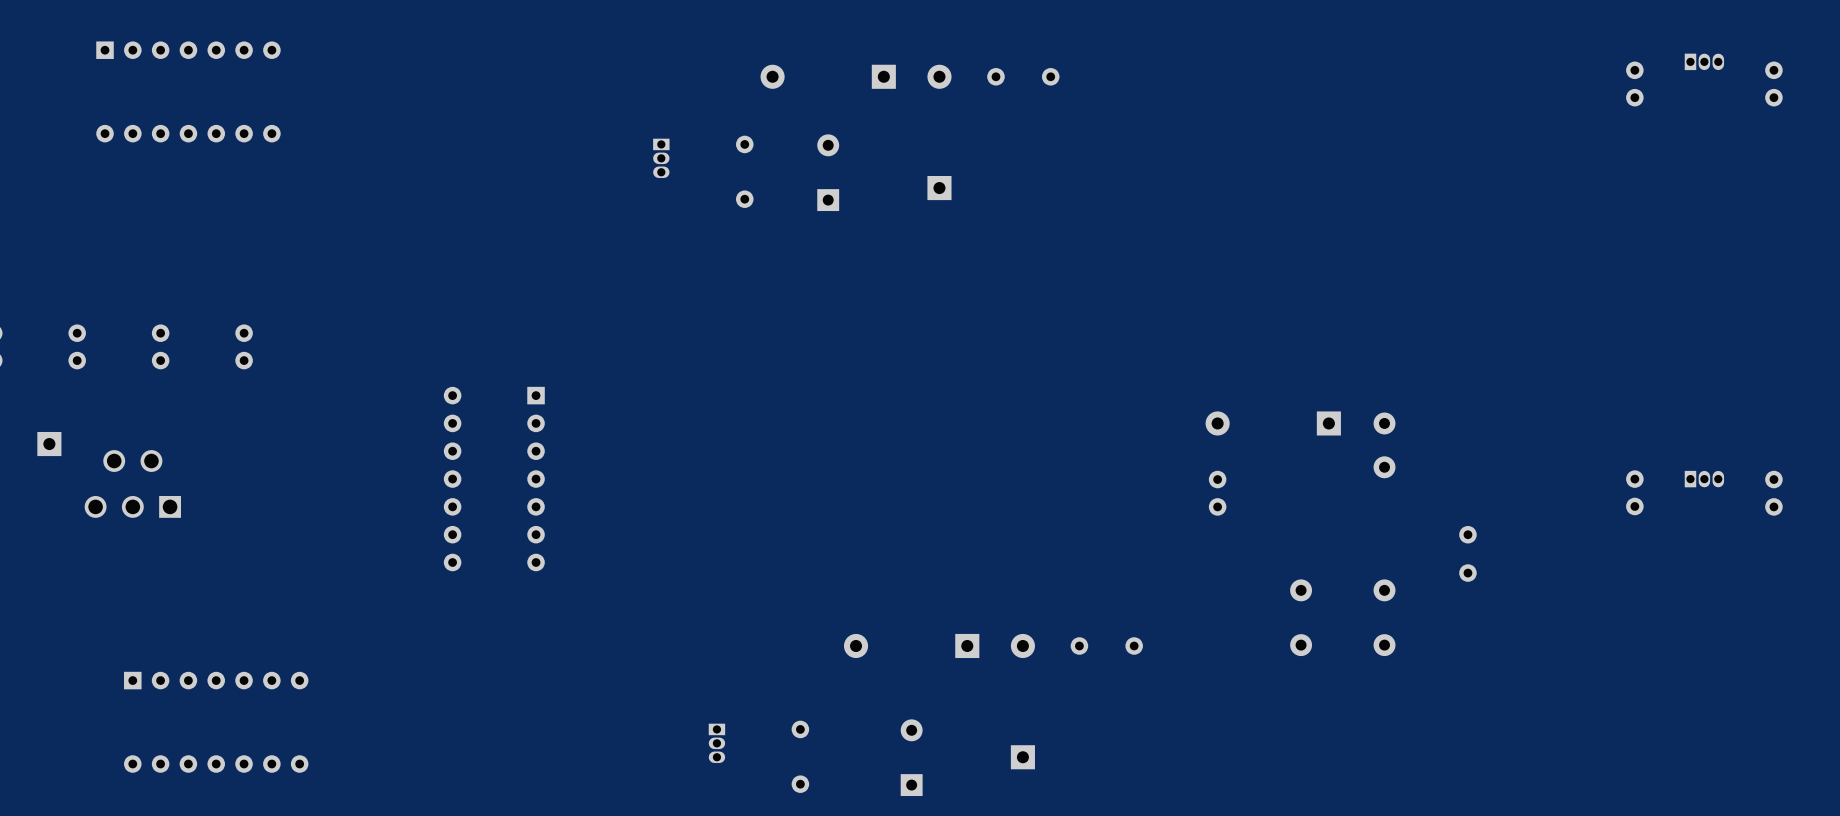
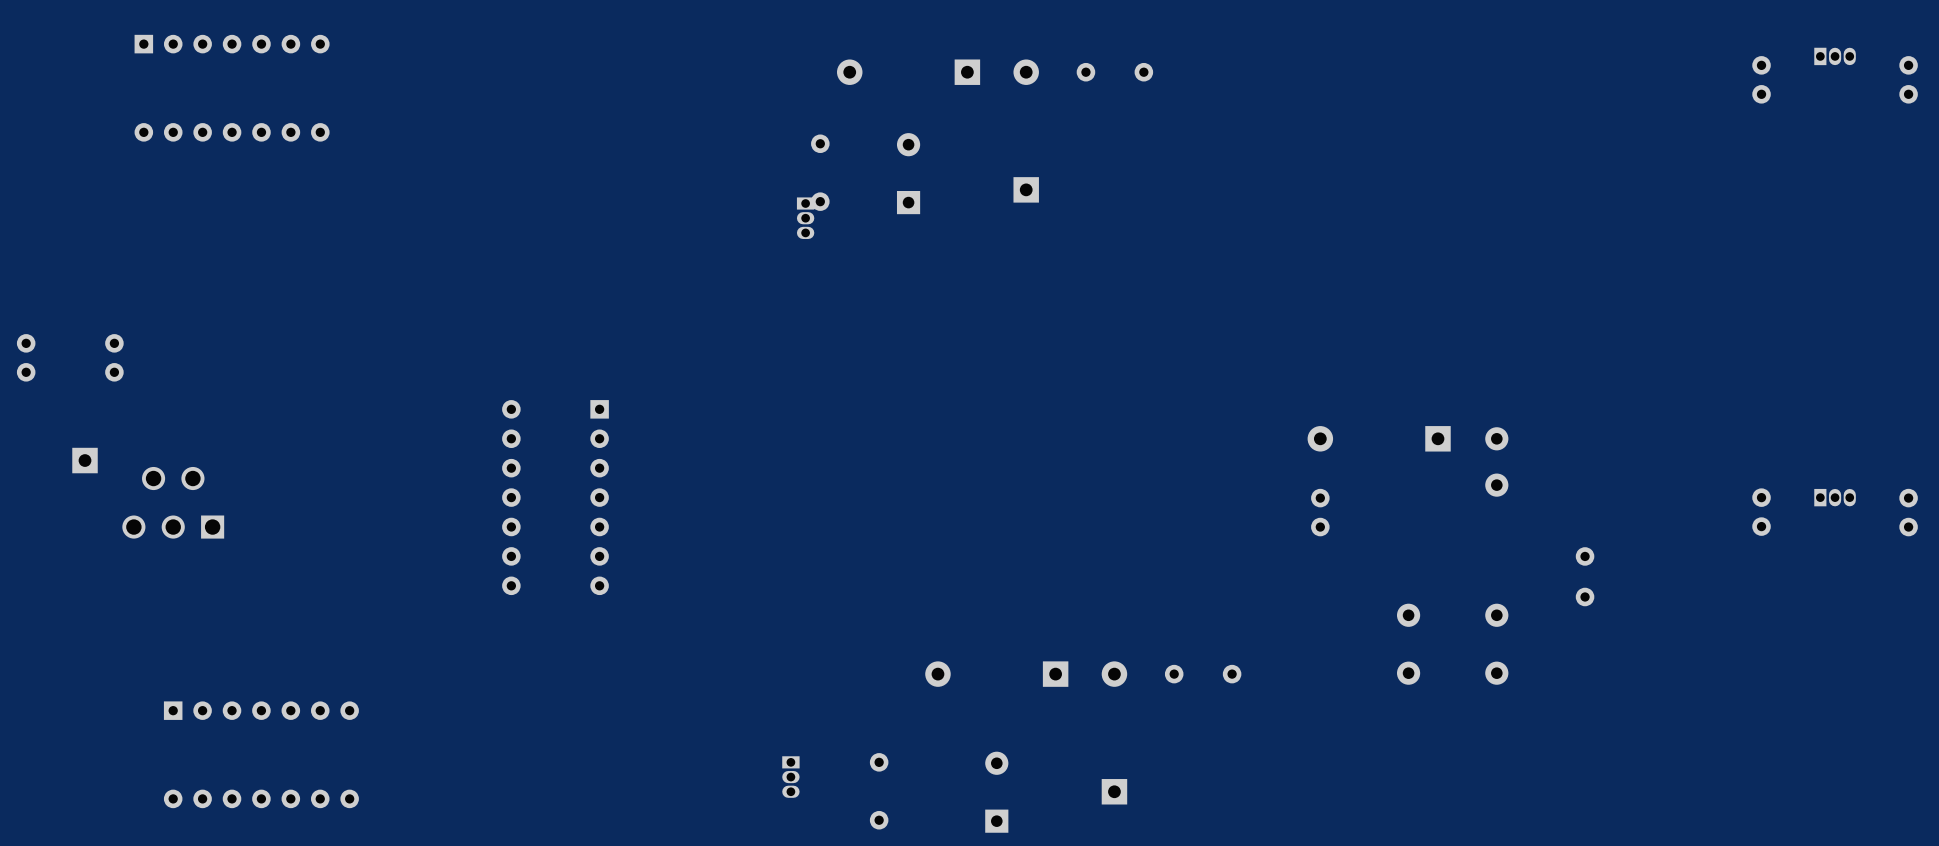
part position: (661, 158) -> (805, 218)
part: (160, 346) -> none
part: (244, 346) -> none

